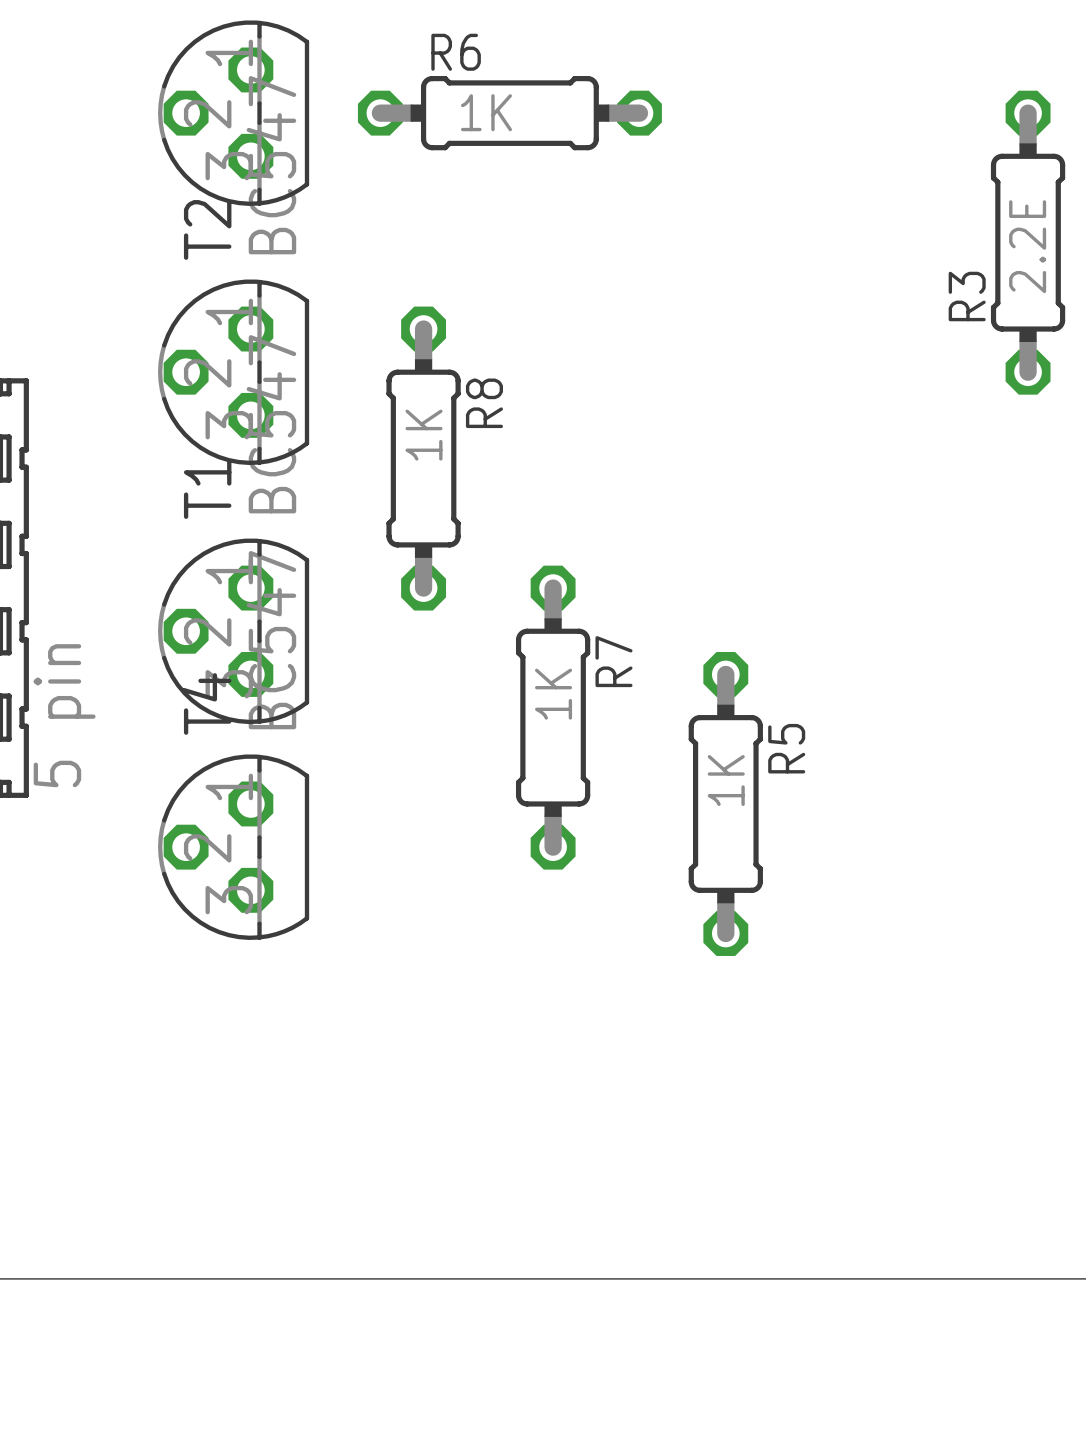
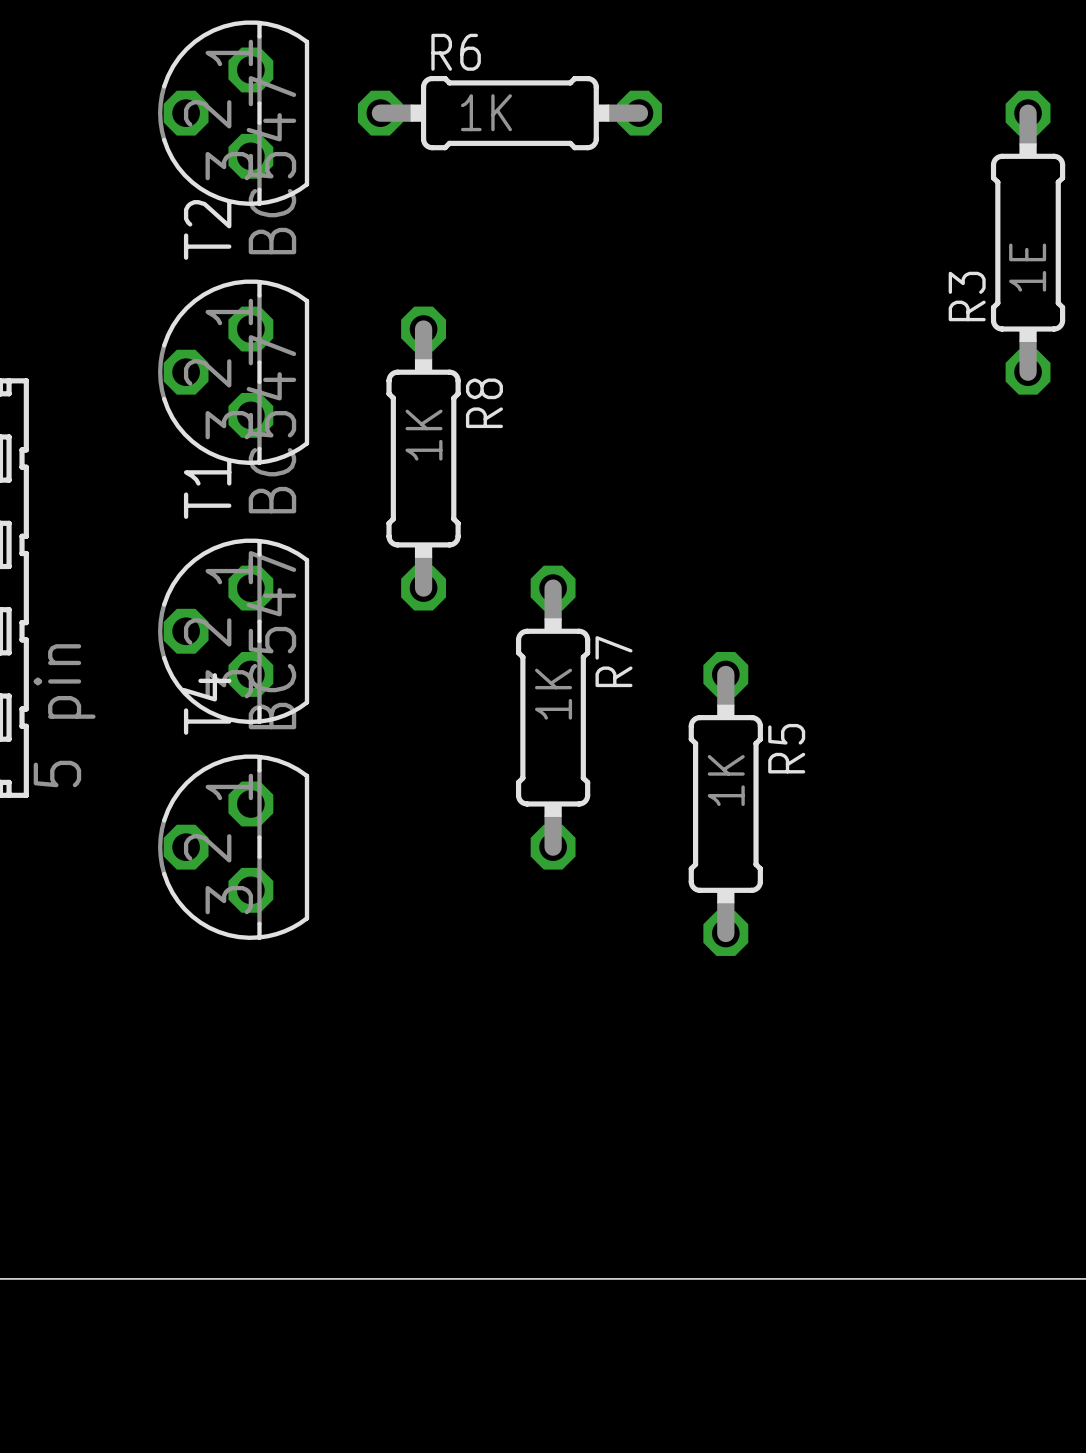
R3 value: 2.2E (1027, 246) -> 1E (1027, 267)

